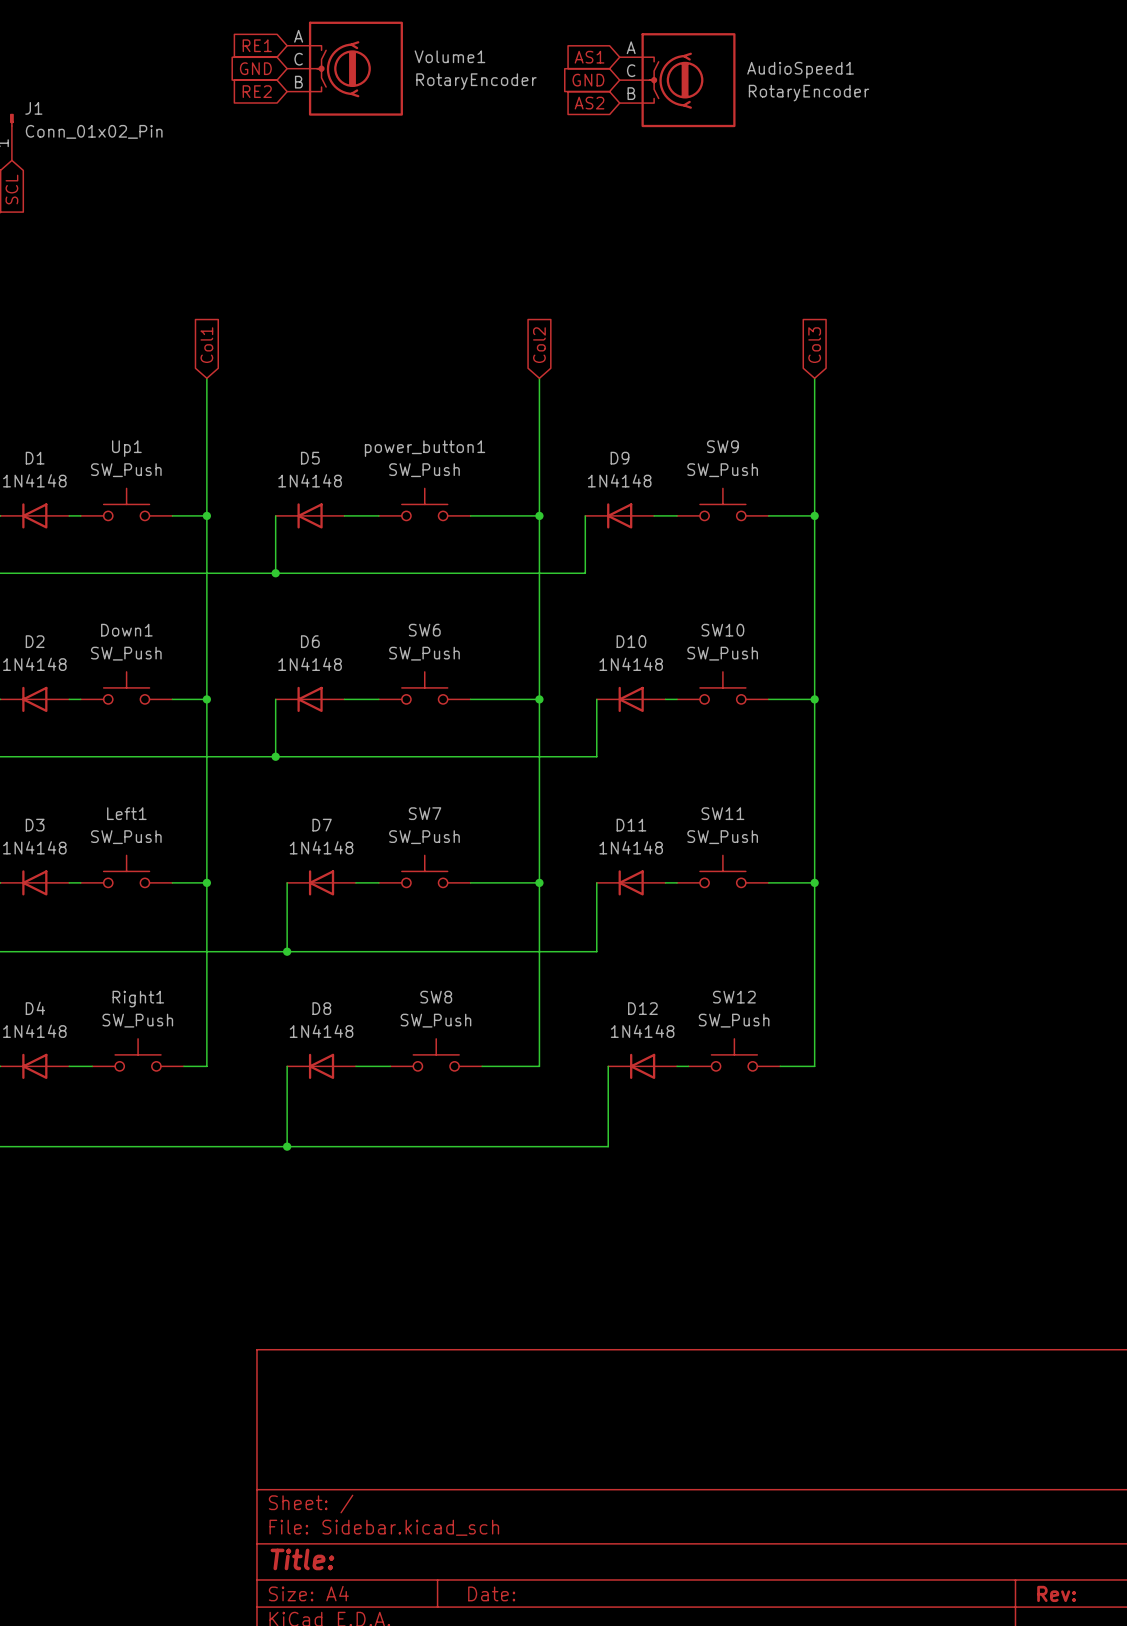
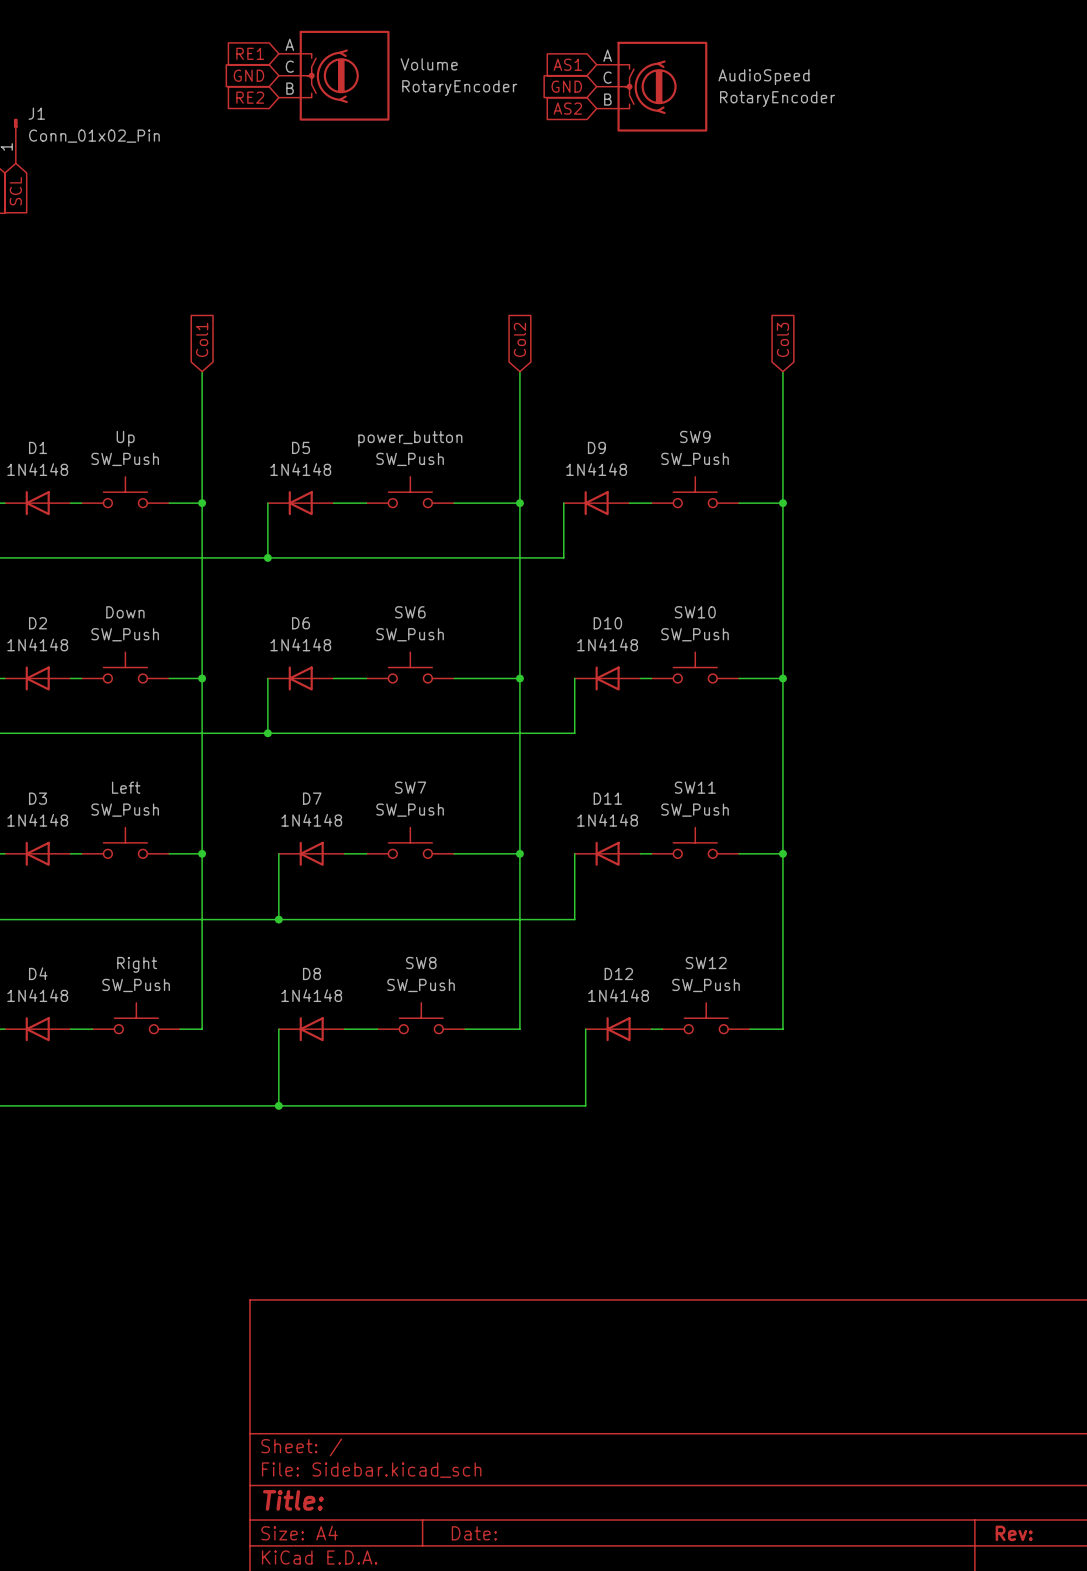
Volume1 name: Volume1 (449, 56) -> Volume (429, 64)
AudioSpeed1 name: AudioSpeed1 (800, 70) -> AudioSpeed (763, 77)
Up1 name: Up1 (126, 448) -> Up (125, 438)
power_button1 name: power_button1 (425, 448) -> power_button (410, 438)
Down1 name: Down1 (126, 630) -> Down (125, 612)
Left1 name: Left1 (126, 813) -> Left (126, 787)
Right1 name: Right1 (138, 999) -> Right (137, 964)

